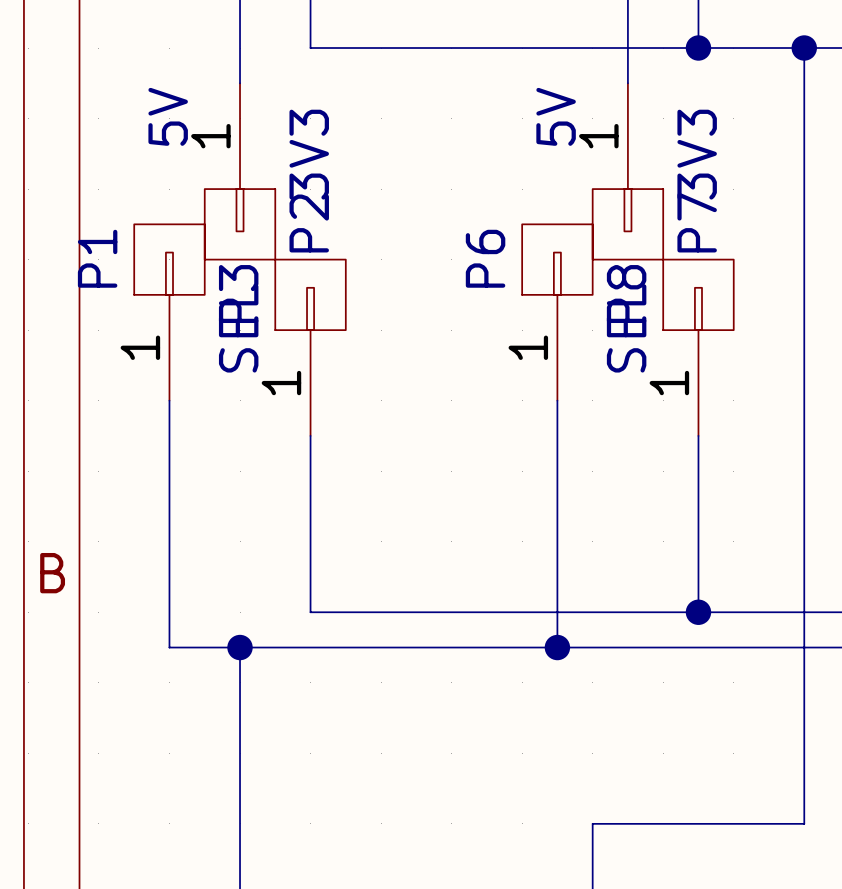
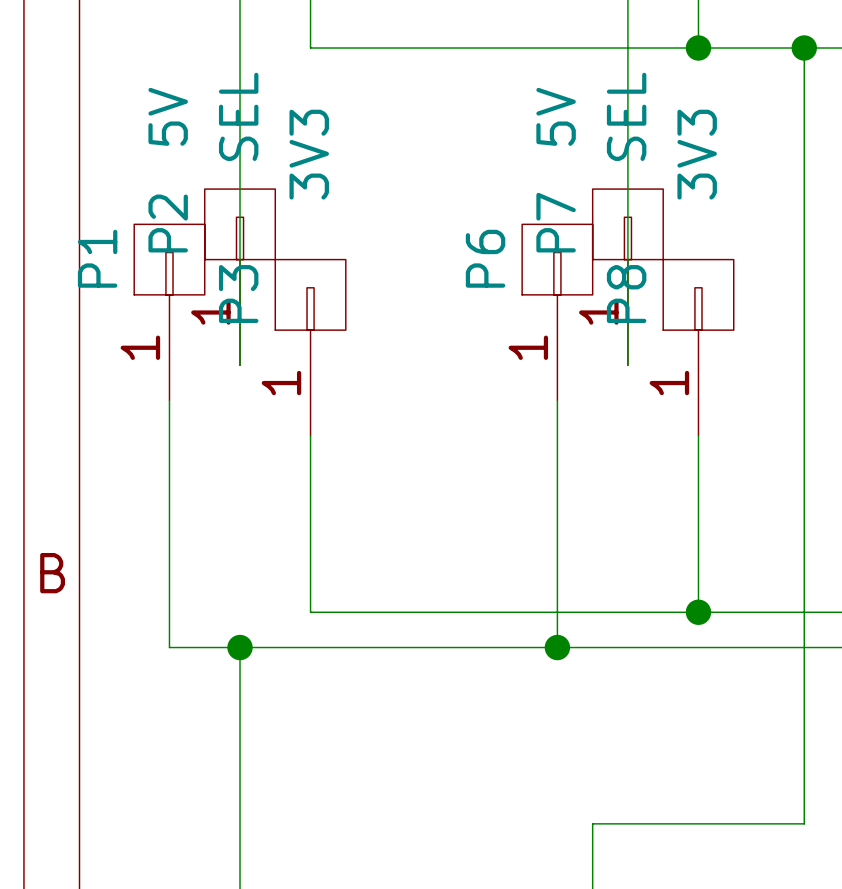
P2 position: (240, 171) -> (240, 277)
P7 position: (627, 171) -> (627, 277)
P2 rotation: 0° (240, 224) -> 180° (240, 224)
P7 rotation: 0° (627, 224) -> 180° (627, 224)

